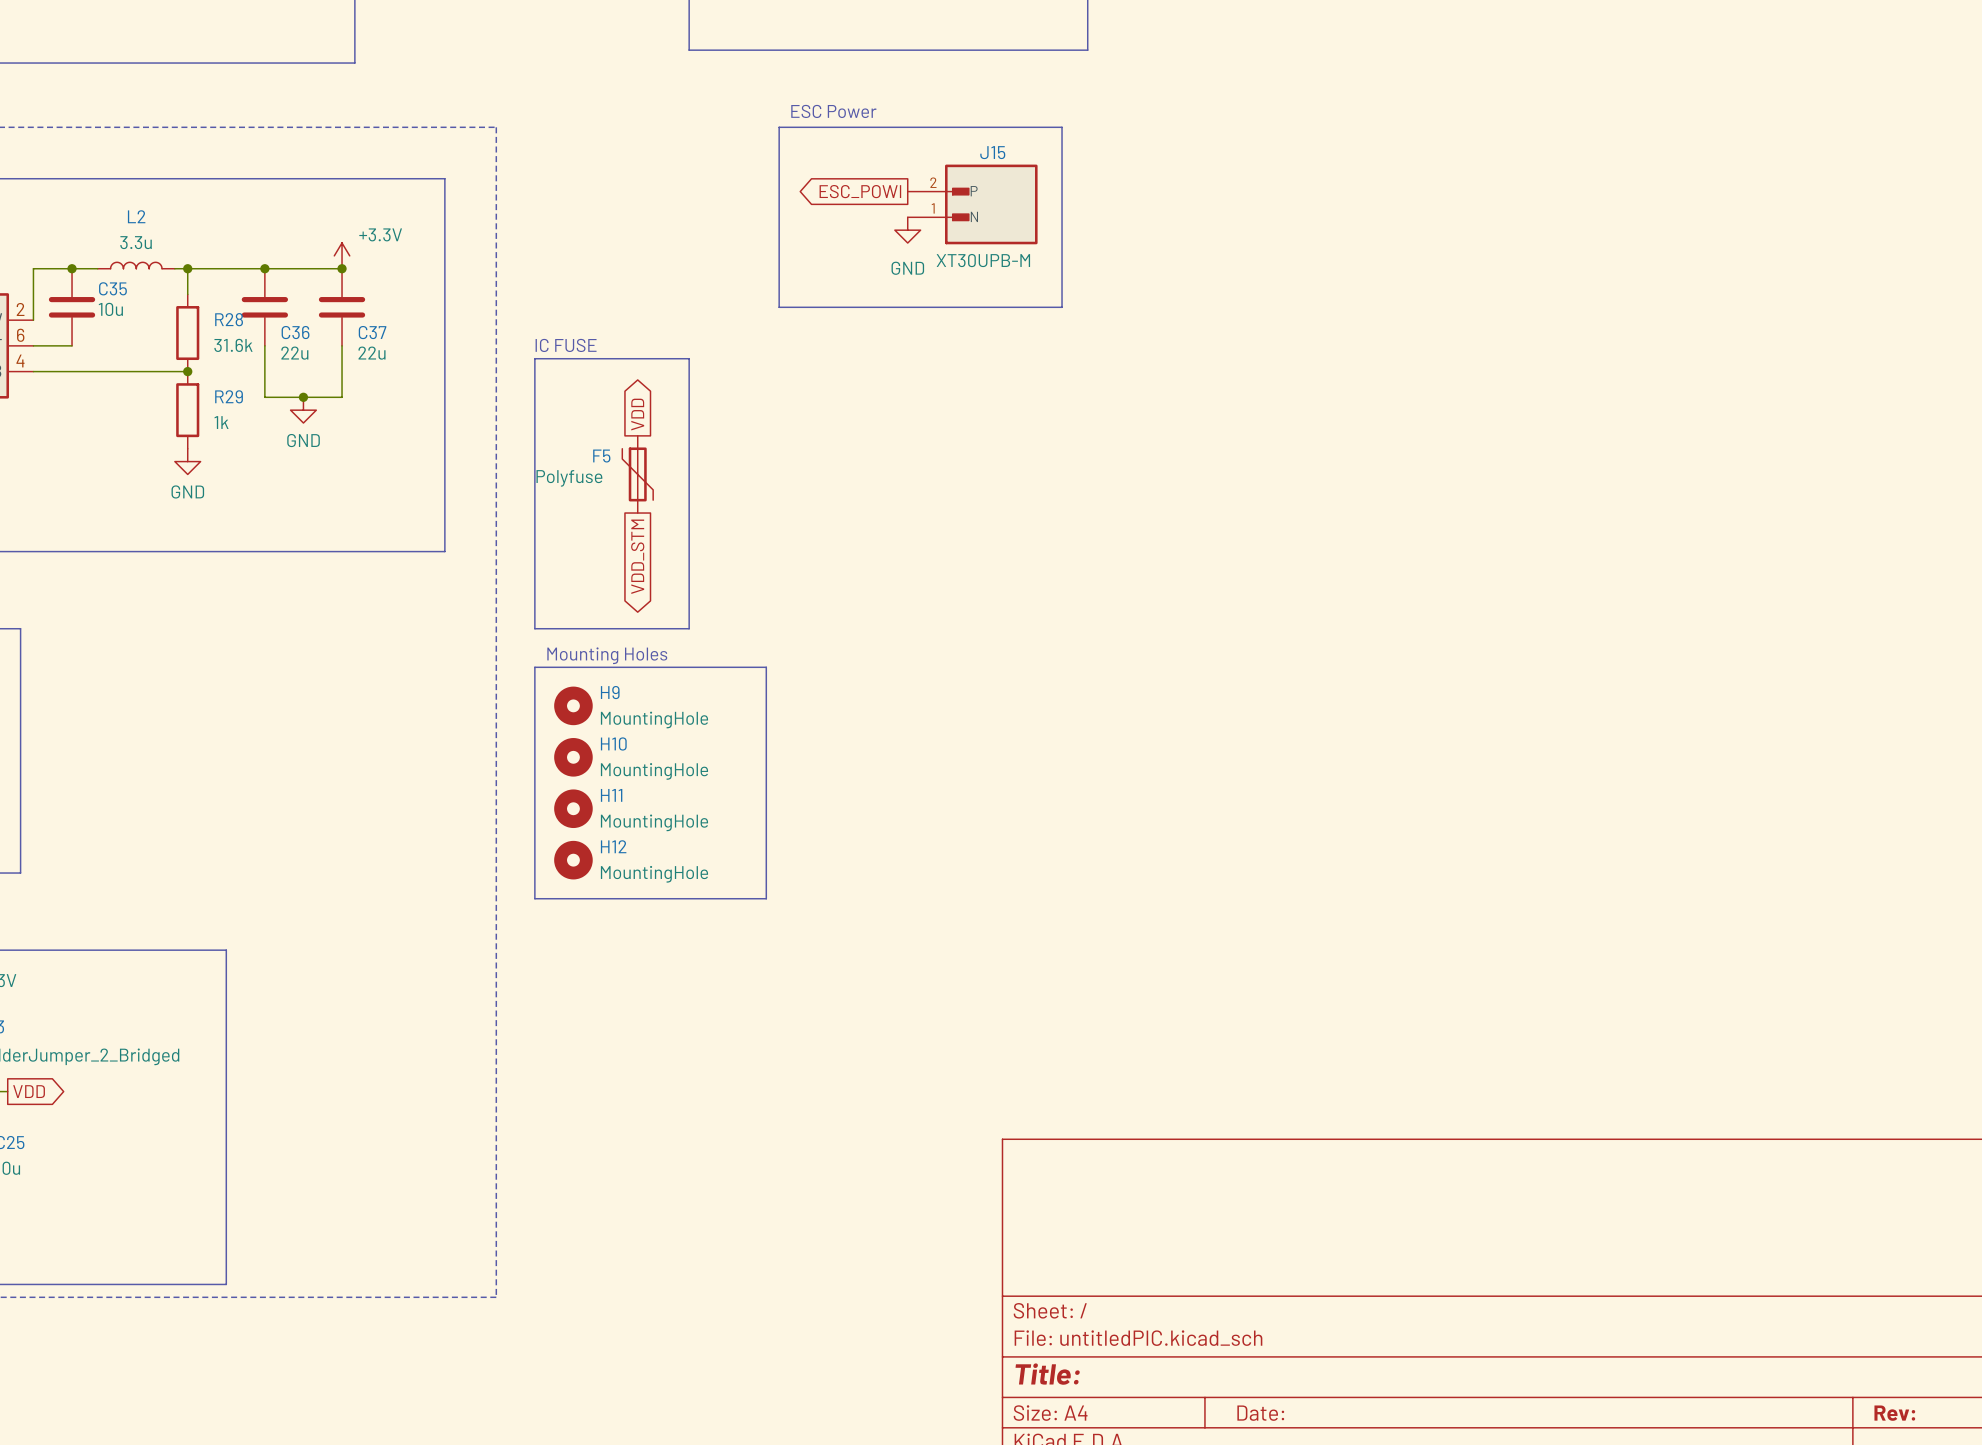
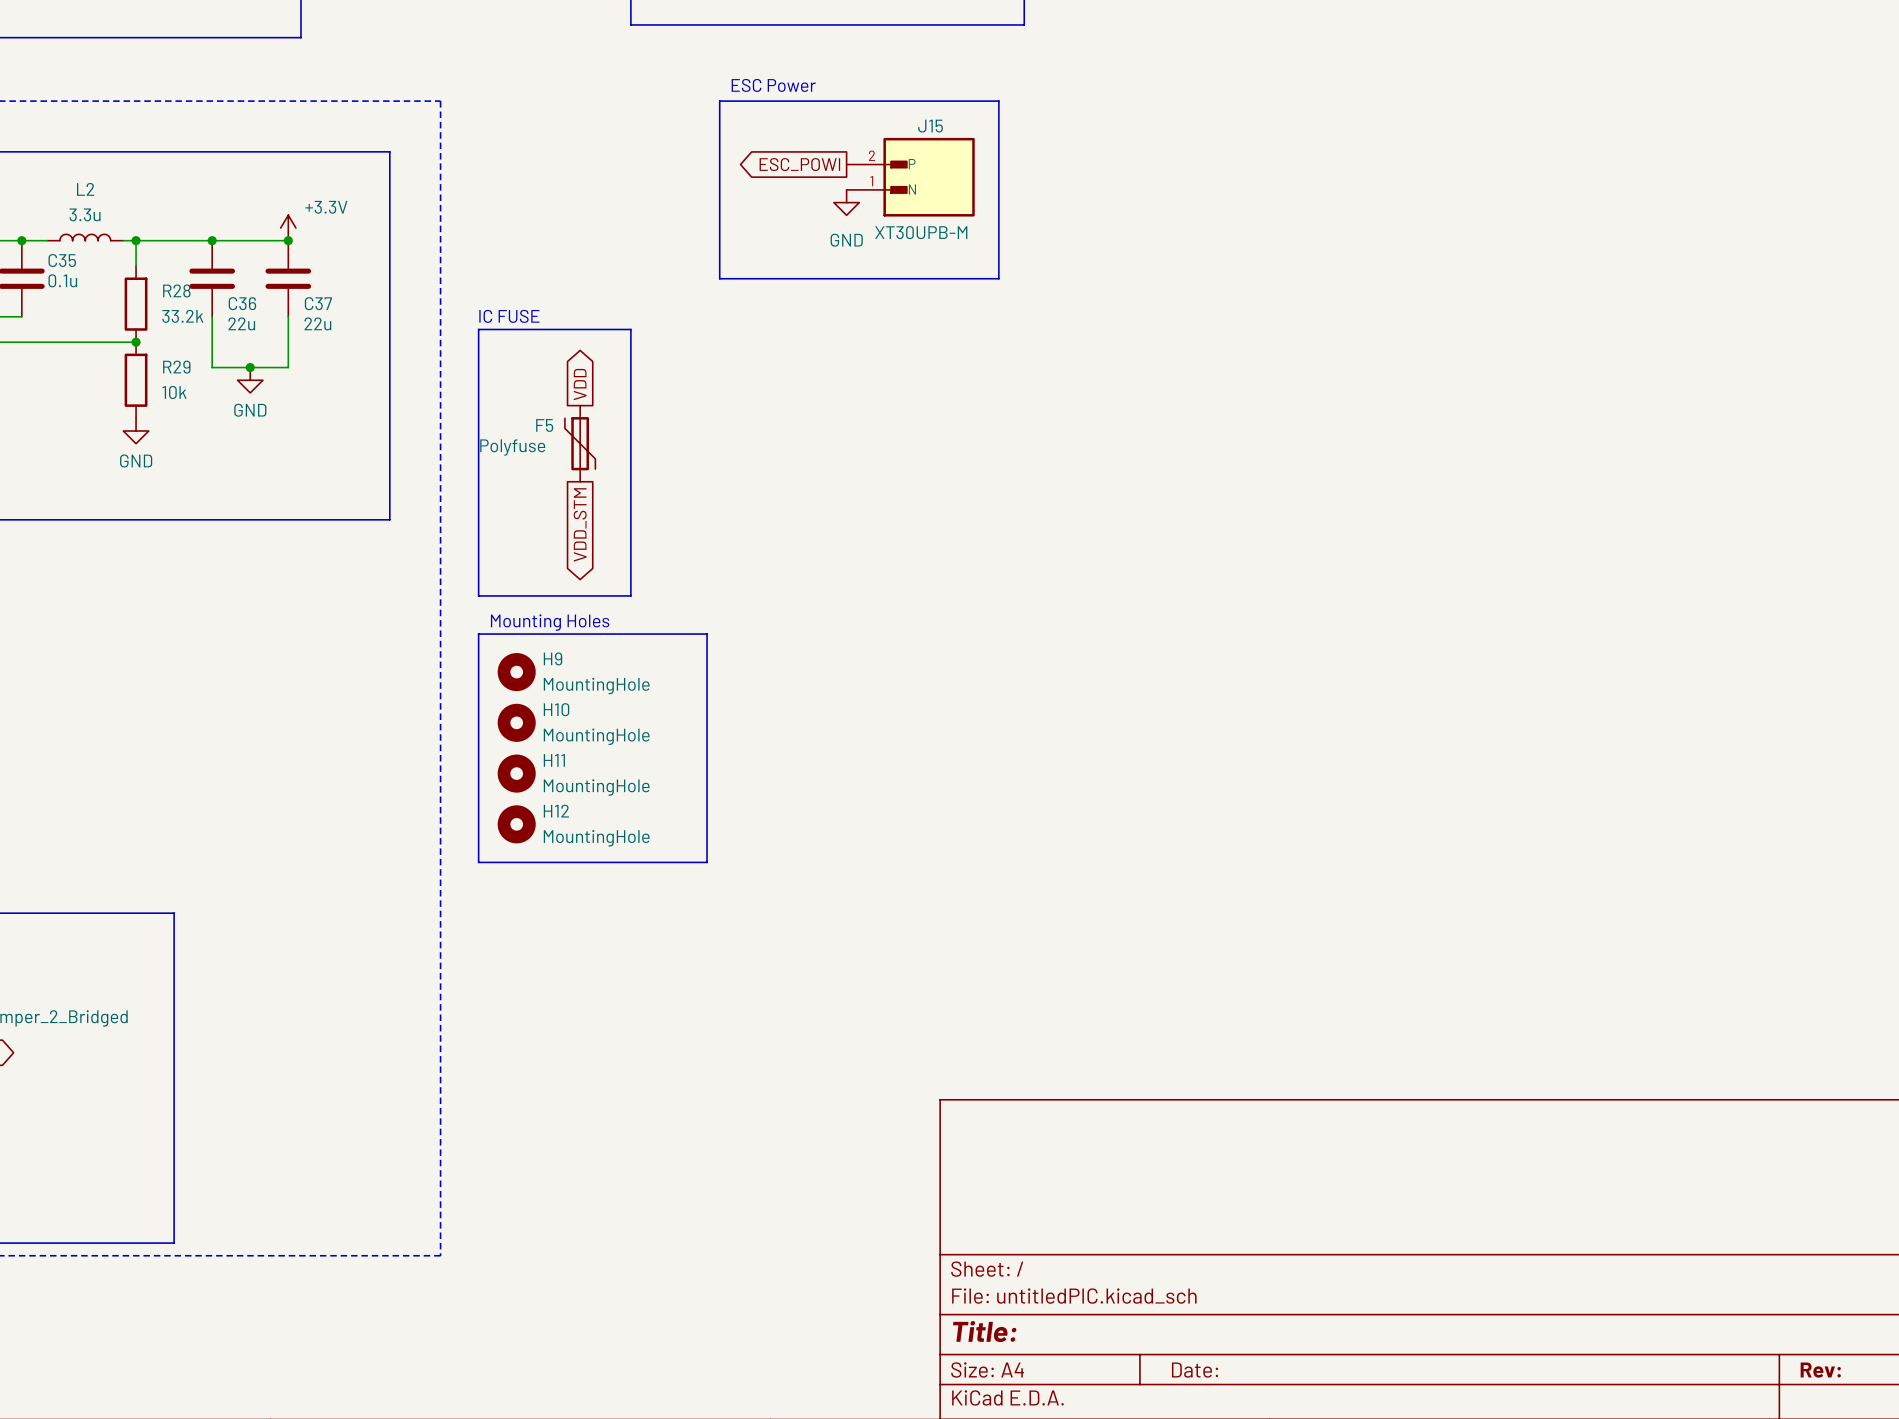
C35 value: 10u (110, 309) -> 0.1u (62, 280)
R28 value: 31.6k (233, 345) -> 33.2k (182, 316)
R29 value: 1k (221, 422) -> 10k (174, 392)

